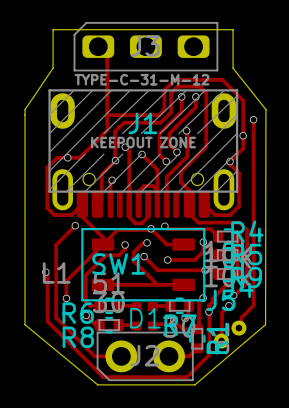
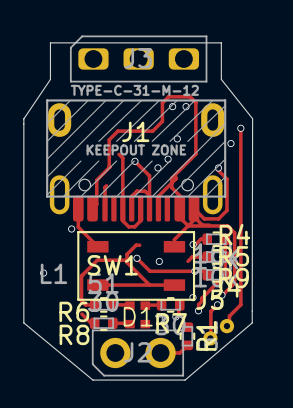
track: (98, 46) (107, 55) (107, 130) (79, 157) (57, 157) (47, 167) (47, 208) (56, 214) -> none
track: (181, 96) (181, 111) (159, 133) (159, 154) (166, 161) -> none
track: (195, 96) (195, 107) (169, 133) (169, 144) (176, 152) -> none
track: (107, 115) (158, 115) (164, 109) (164, 90) (174, 79) (222, 79) (243, 100) (243, 148) (230, 162) -> none
track: (186, 130) (187, 156) (166, 177) (166, 191) -> (176, 177) (158, 196)
via: (125, 147) -> none
via: (67, 157) -> none
via: (115, 160) -> none
via: (112, 180) -> none
track: (82, 204) (71, 215) (56, 215) -> none
track: (82, 216) (103, 237) (103, 244) (66, 281) (66, 298) -> (78, 220) (78, 227) (97, 246)
track: (75, 225) (56, 244) (56, 317) (94, 356) (121, 356) -> none
track: (164, 226) (167, 229) (210, 229) (218, 236) -> (193, 246) (200, 239) (207, 239)
via: (164, 226) -> none
via: (151, 228) -> none
via: (147, 242) -> none
track: (103, 244) (117, 230) (151, 228) (166, 244) (183, 244) -> (209, 225) (202, 225) (192, 215) (194, 208) (194, 220) (174, 239) (174, 246)
track: (125, 244) (125, 249) (118, 255) (105, 255) (102, 258) -> (127, 260) (97, 260)
via: (125, 244) -> none
track: (216, 255) (203, 242) (203, 251) (194, 260) (167, 260) -> (205, 257) (192, 257) (187, 261)
track: (45, 272) (47, 274) (47, 321) (103, 377) (187, 377) (209, 354) (208, 311) -> none
via: (66, 298) -> none
track: (203, 298) (199, 301) (199, 327) (197, 329) (182, 329) (173, 320) (170, 324) (152, 324) -> none
via: (86, 315) -> none

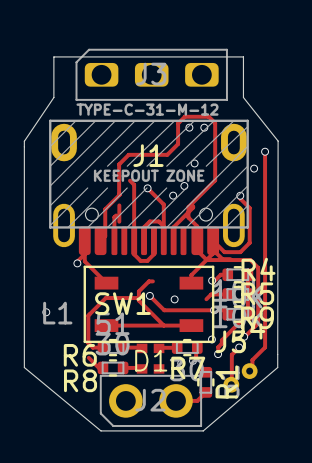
track: none -> (119, 205) (119, 221)
track: none -> (84, 254) (77, 261)

